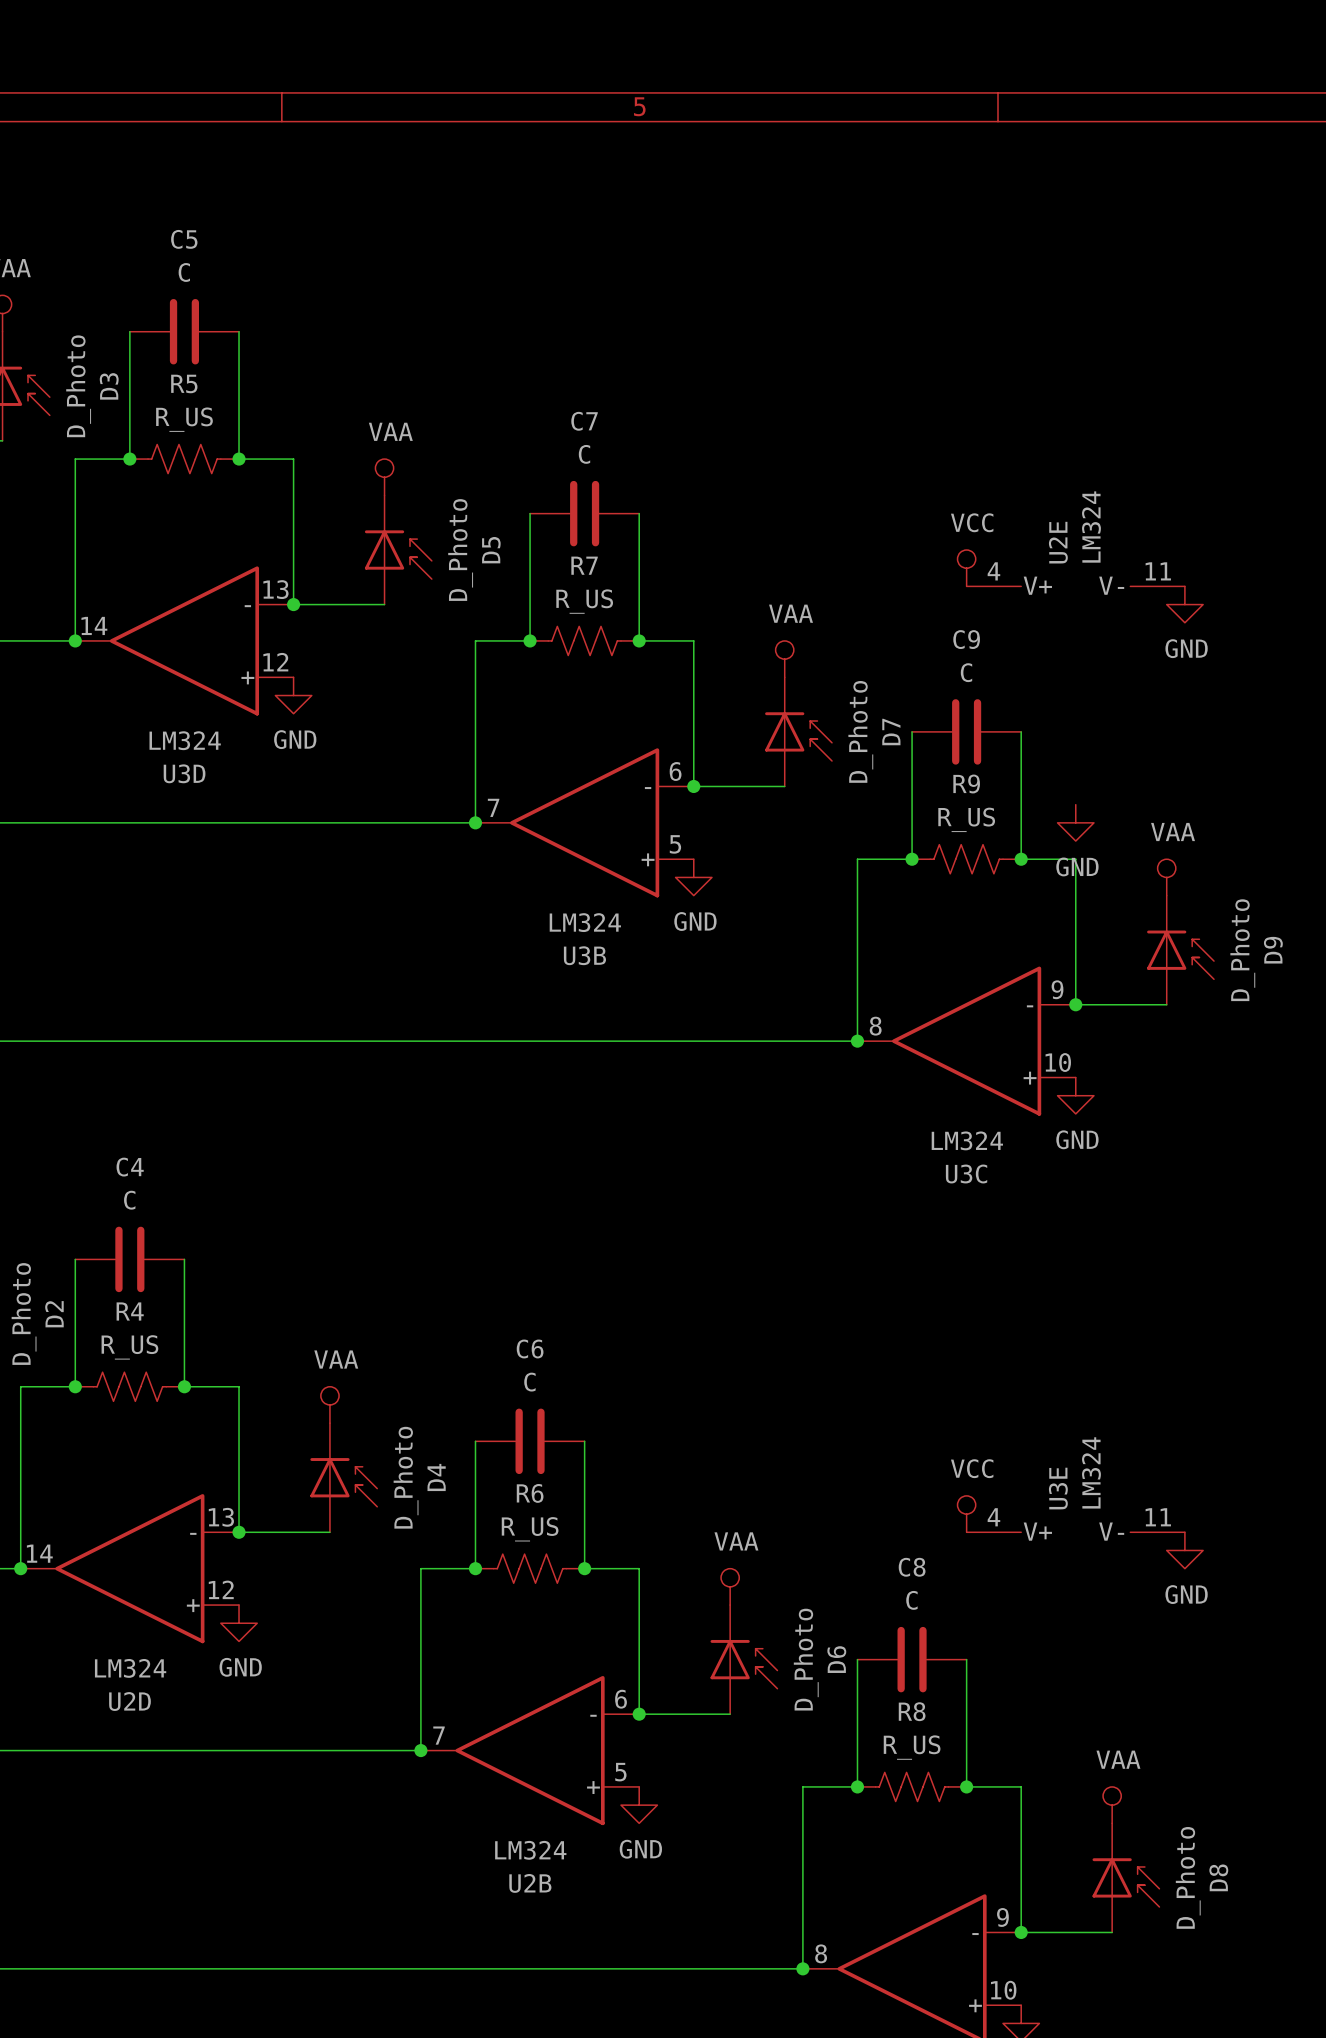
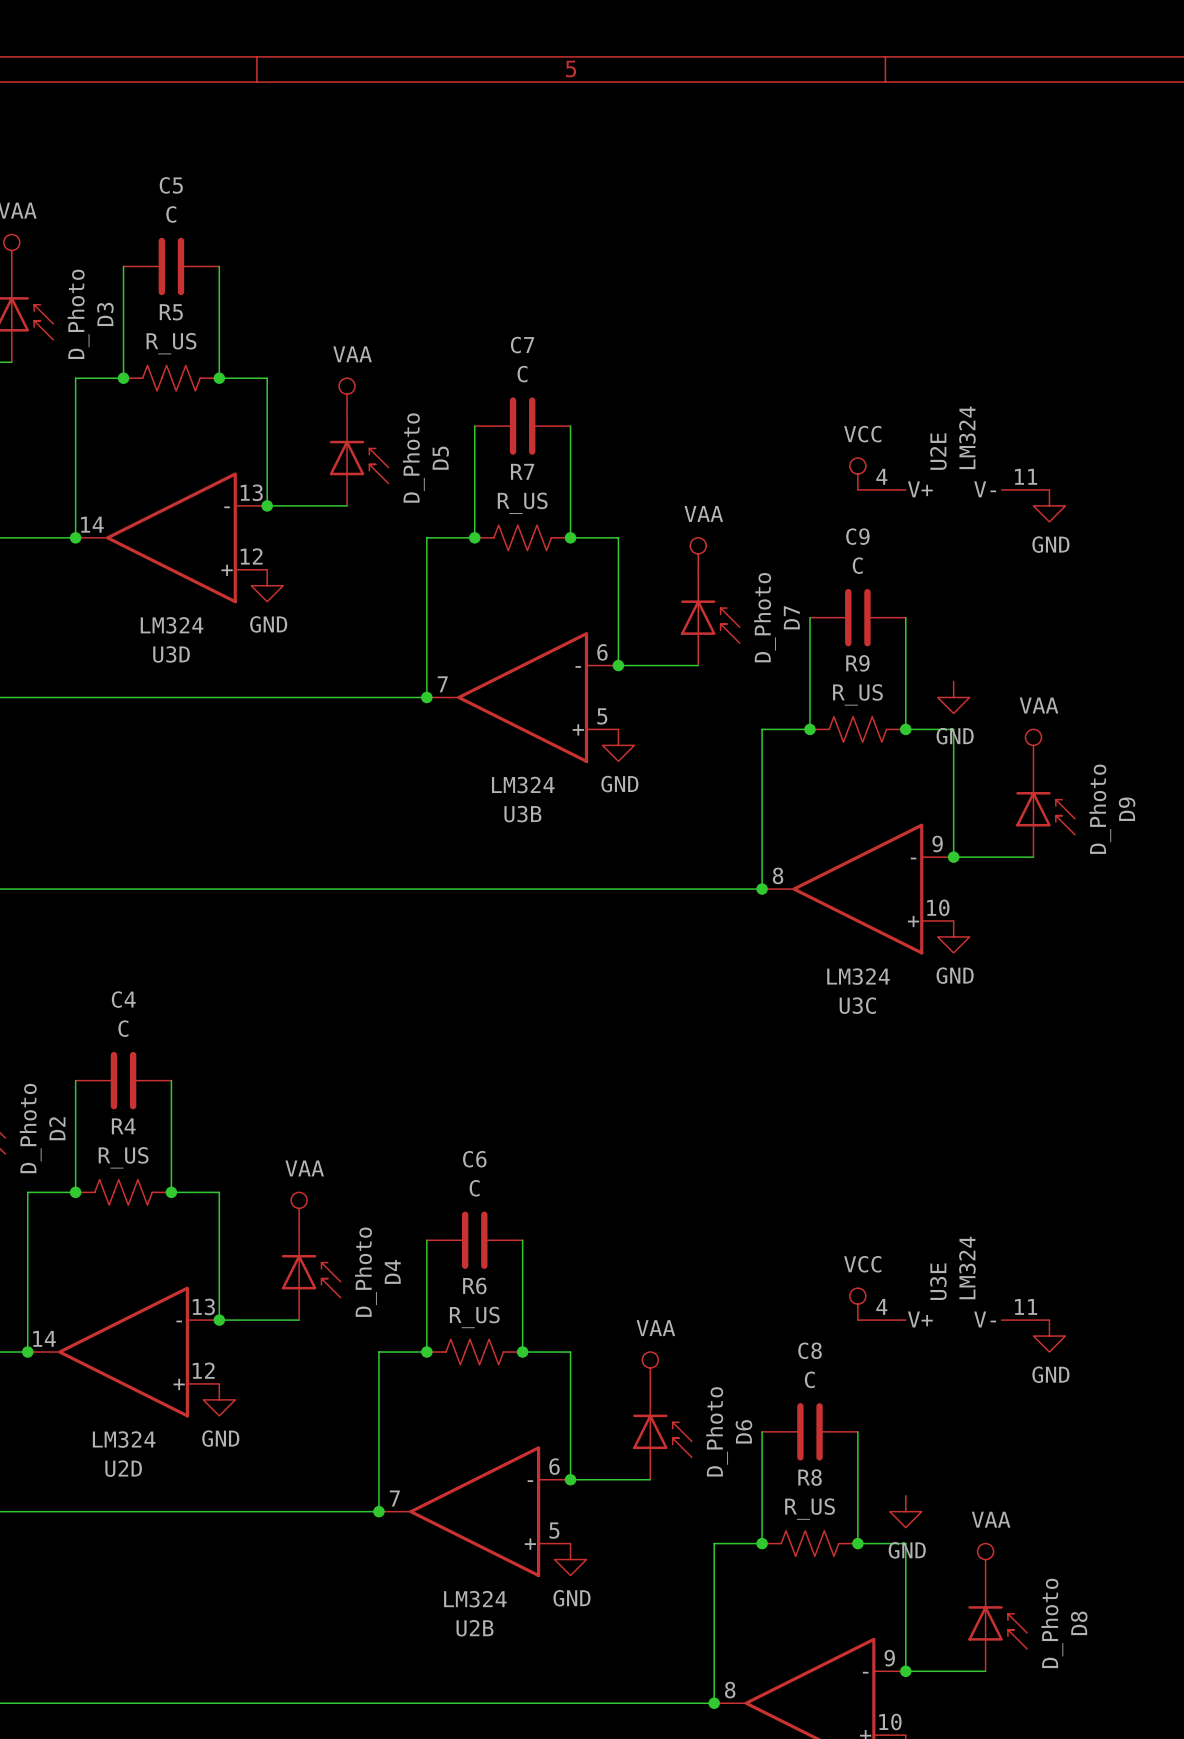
power symbol: none -> GND (905, 1511)

